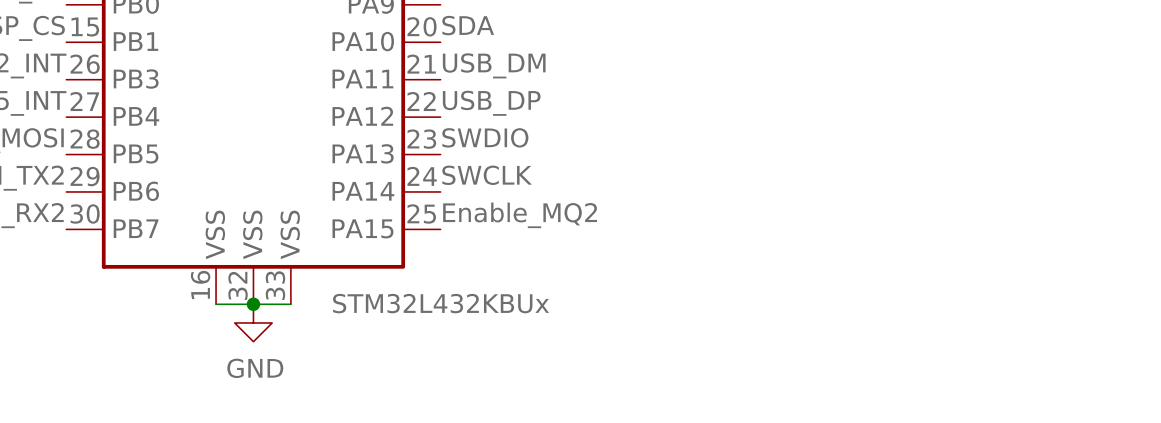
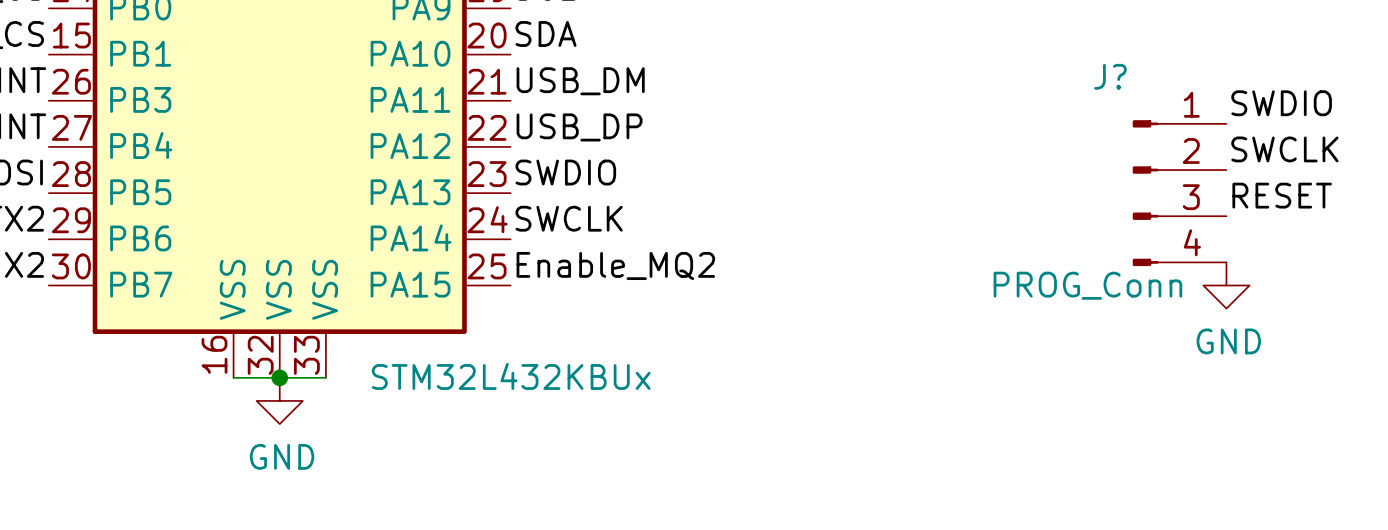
label: none -> SWDIO (1281, 103)
label: none -> SWCLK (1284, 149)
J?: none -> PROG_Conn (1179, 193)
label: none -> RESET (1282, 195)
power symbol: none -> GND (1226, 285)

